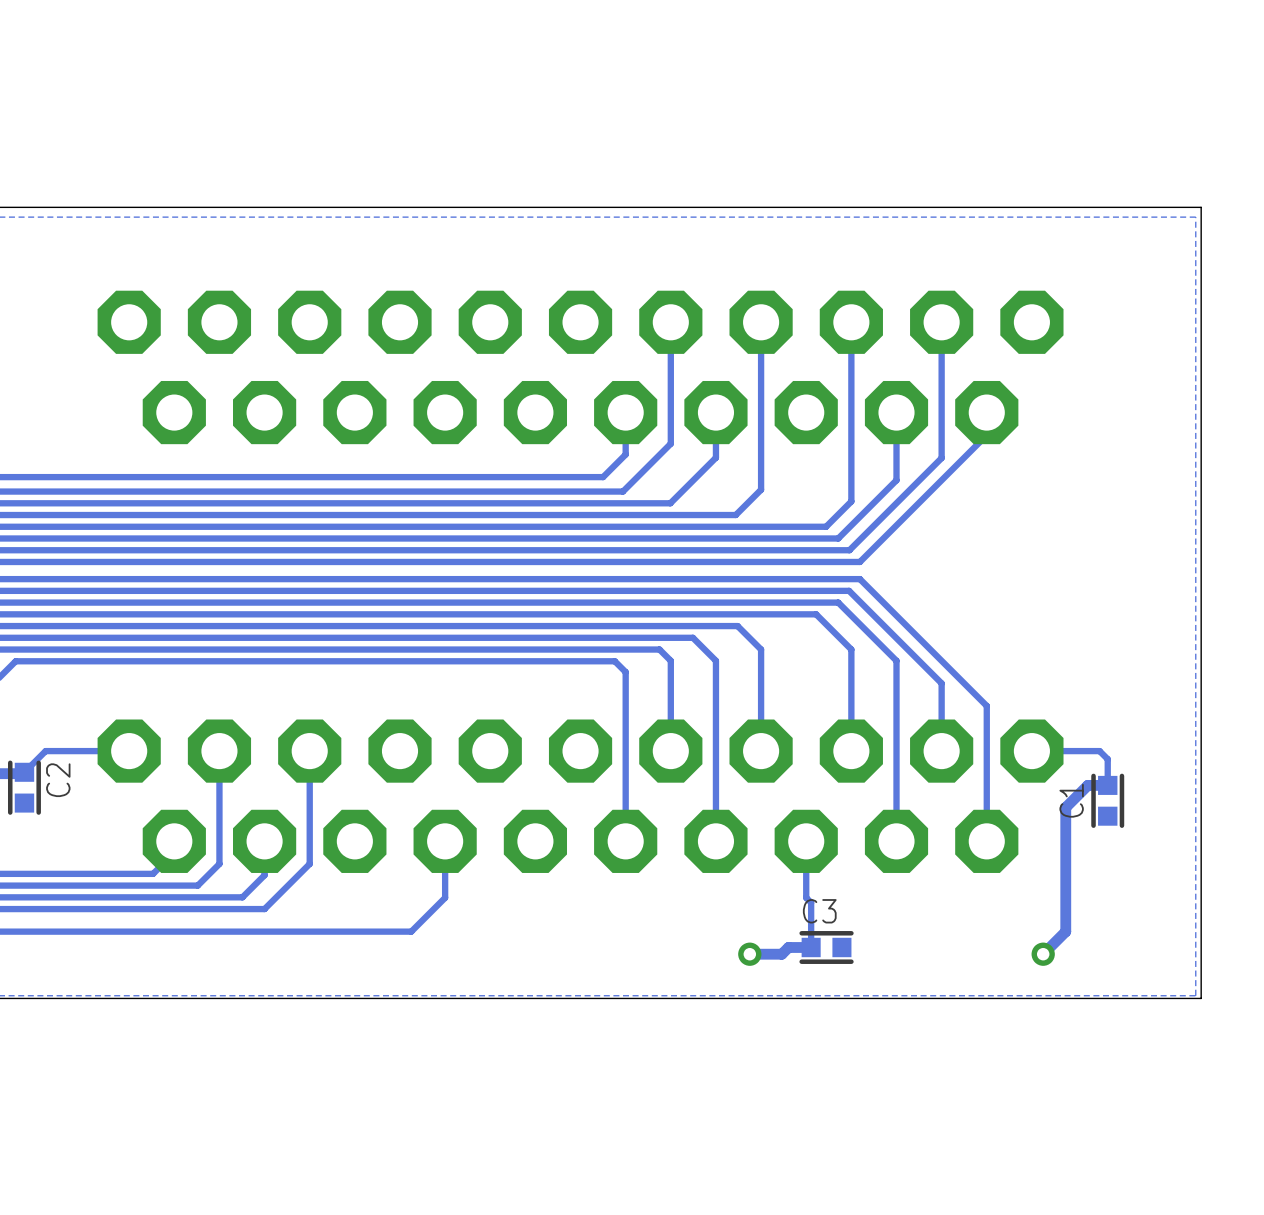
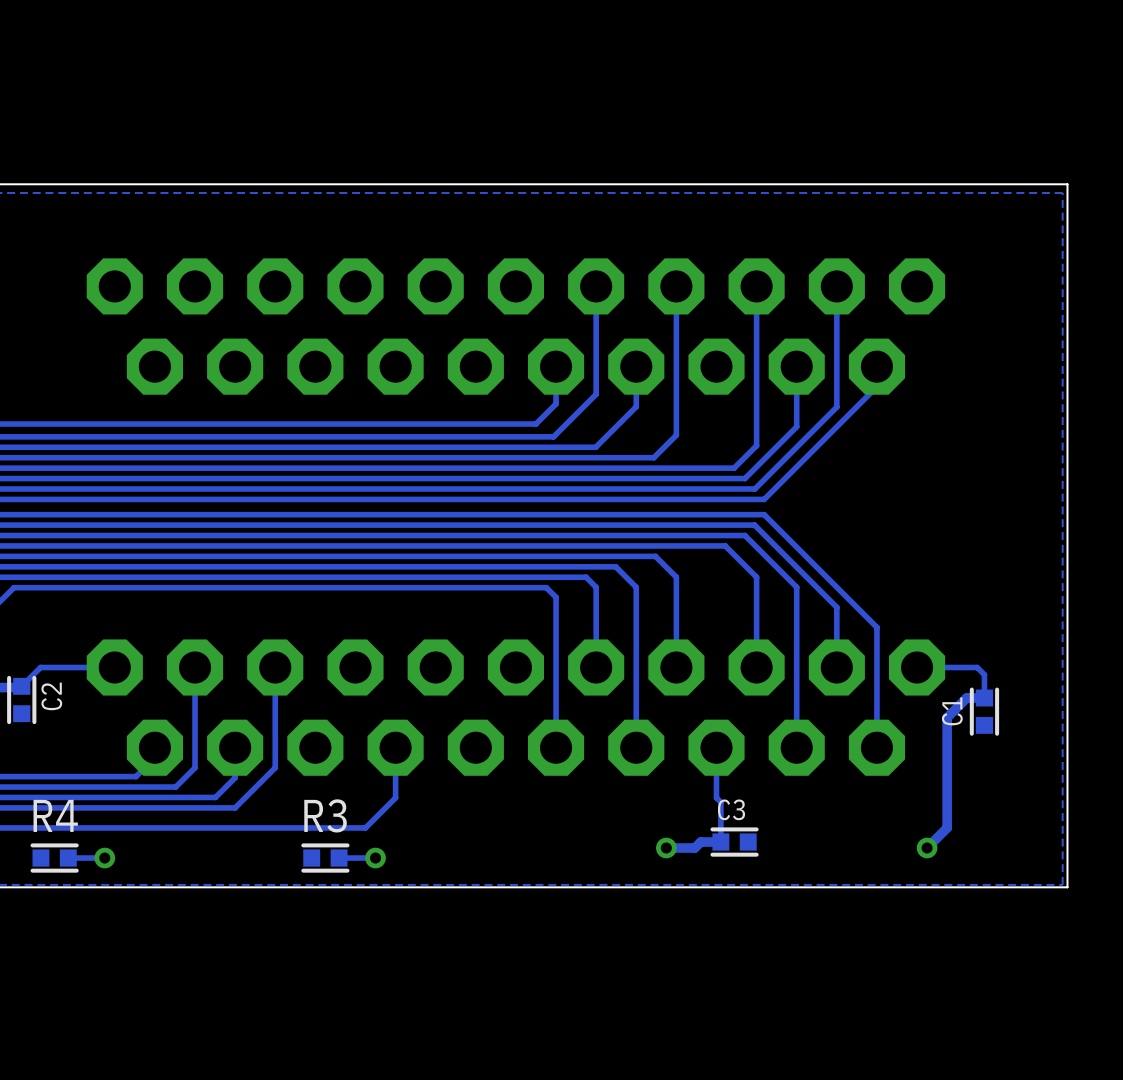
R4: none -> (54, 858)
track: none -> (104, 858) (68, 858)
via: none -> (104, 858)
R3: none -> (325, 858)
track: none -> (375, 858) (339, 858)
via: none -> (375, 858)

